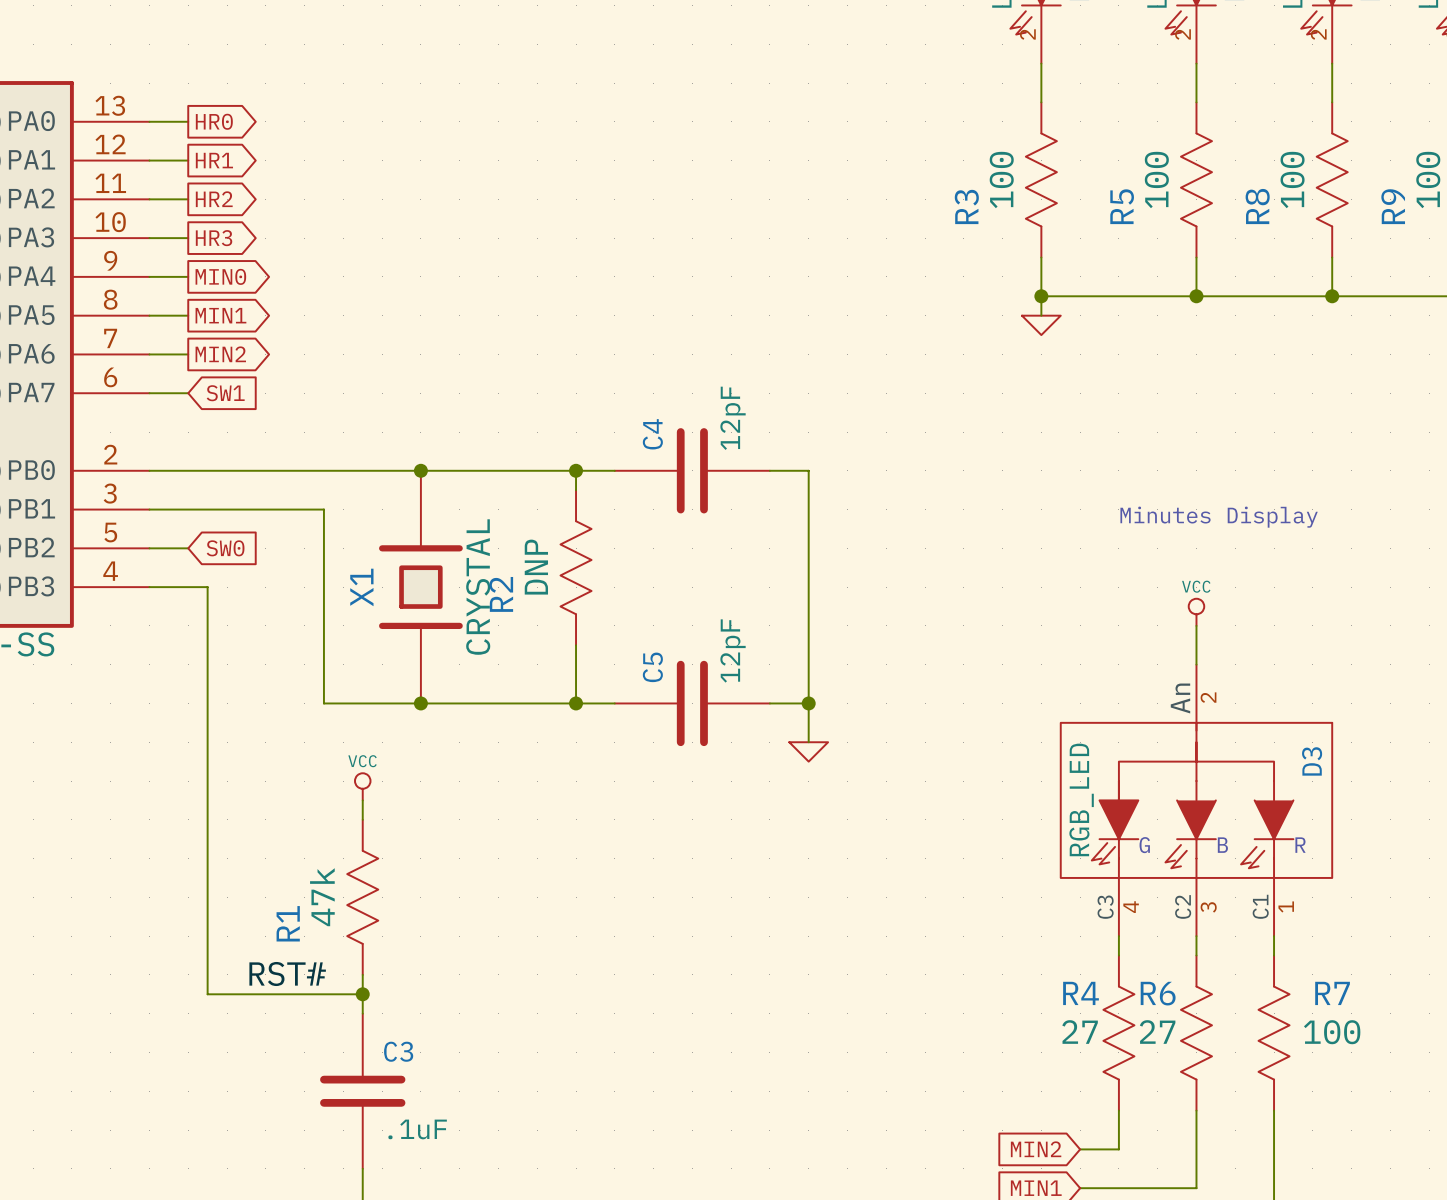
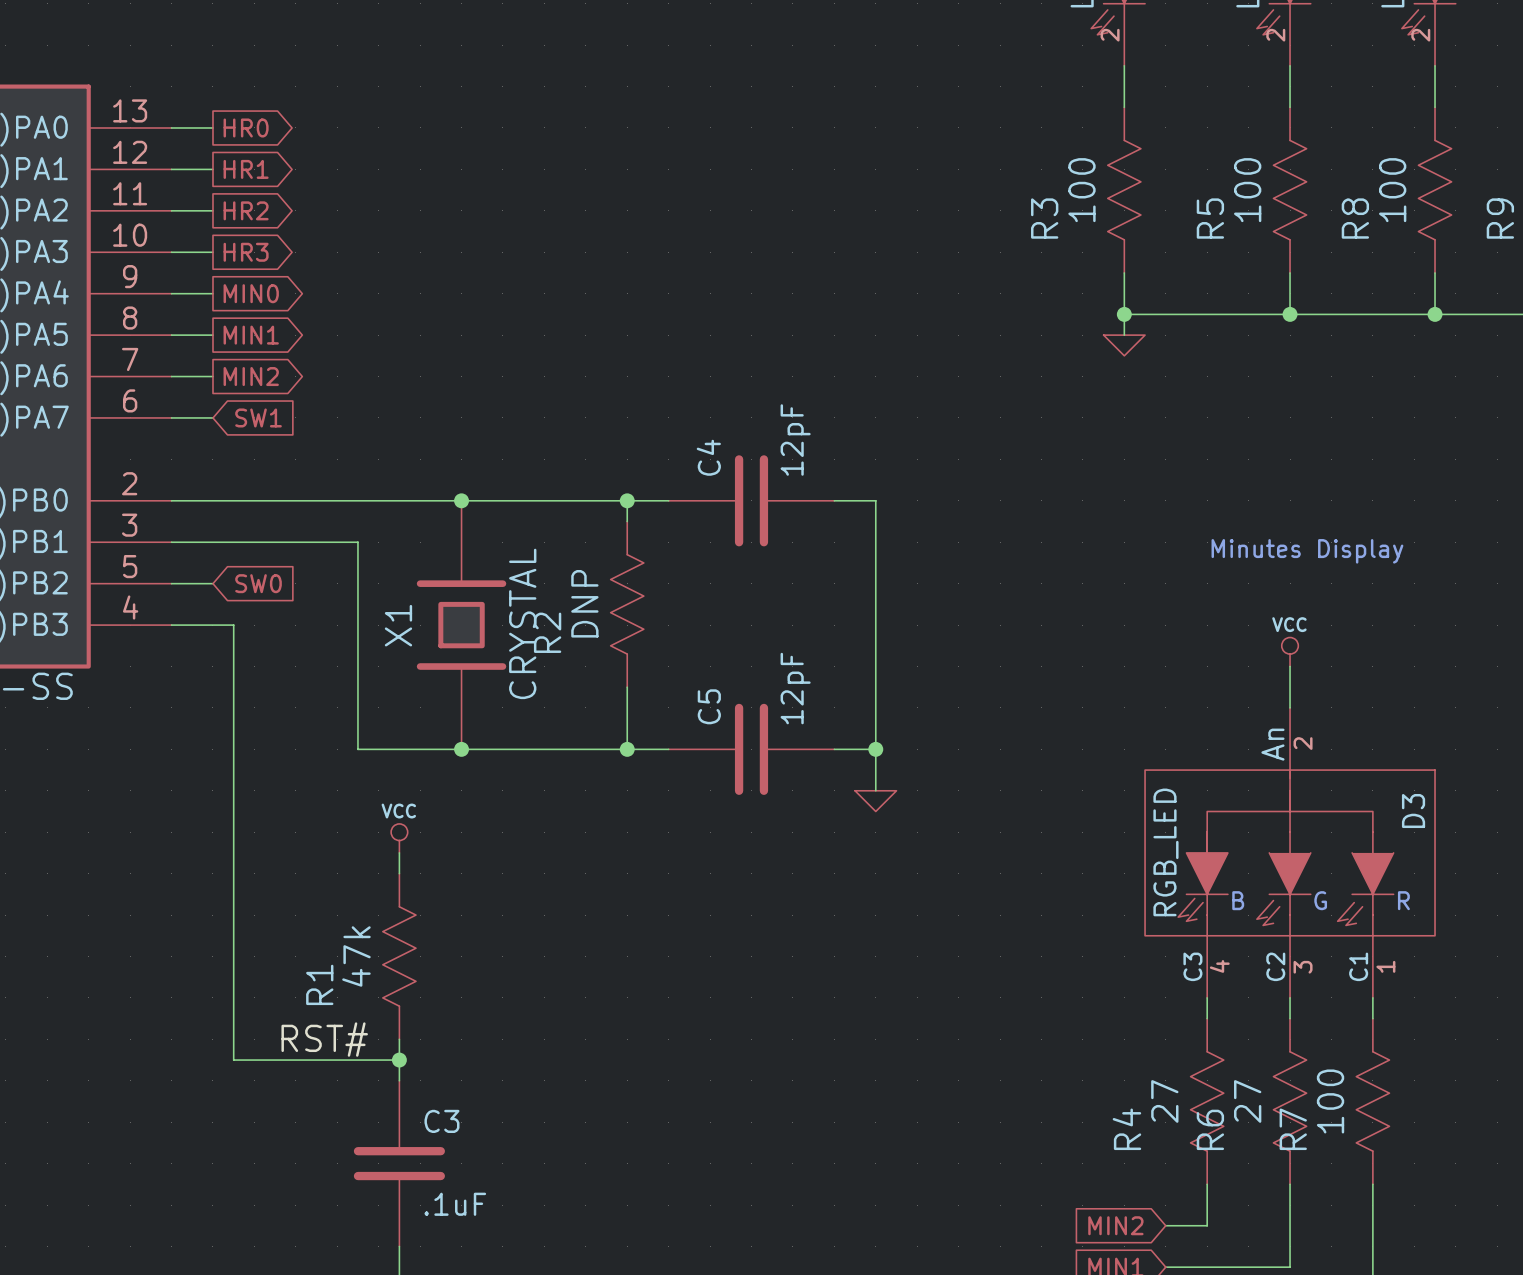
text: G (1144, 845) -> B (1238, 900)
text: B (1222, 845) -> G (1320, 900)
R4 name rotation: 0° (1081, 993) -> 90° counterclockwise (1126, 1129)
R4 name position: R4 (1081, 993) -> R4 (1126, 1129)
R6 name rotation: 0° (1158, 993) -> 90° counterclockwise (1210, 1129)
R6 name position: R6 (1158, 993) -> R6 (1210, 1129)
R7 name rotation: 0° (1332, 993) -> 90° counterclockwise (1293, 1129)
R7 name position: R7 (1332, 993) -> R7 (1293, 1129)
R4 value rotation: 0° (1080, 1032) -> 90° counterclockwise (1164, 1101)
R6 value rotation: 0° (1157, 1032) -> 90° counterclockwise (1247, 1101)
R7 value rotation: 0° (1332, 1032) -> 90° counterclockwise (1330, 1101)
R7 value position: 100 (1332, 1032) -> 100 (1330, 1101)

